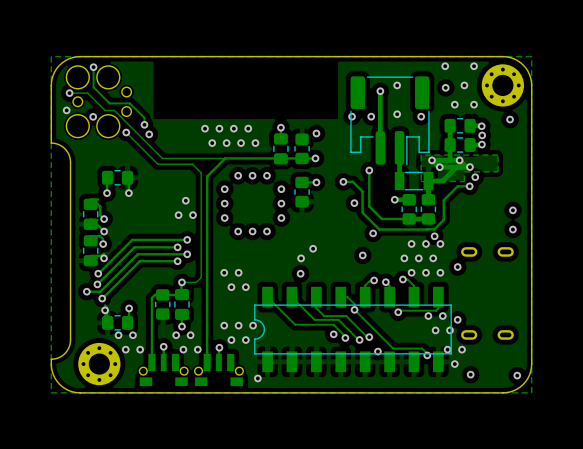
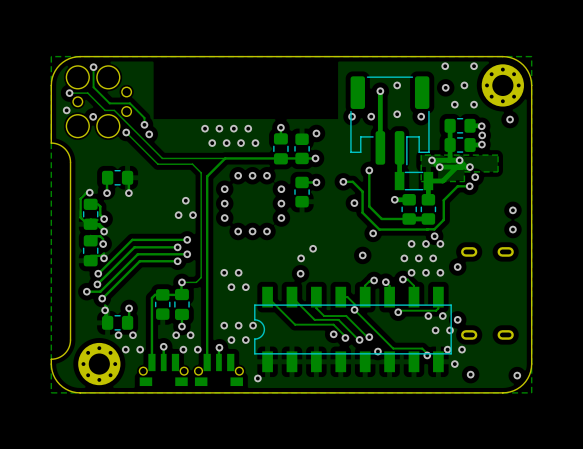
track: none -> (89, 192) (86, 192) (80, 198) (80, 217) (87, 224) (99, 224) (103, 228)
via: none -> (89, 192)
track: (98, 199) (90, 199) -> none

